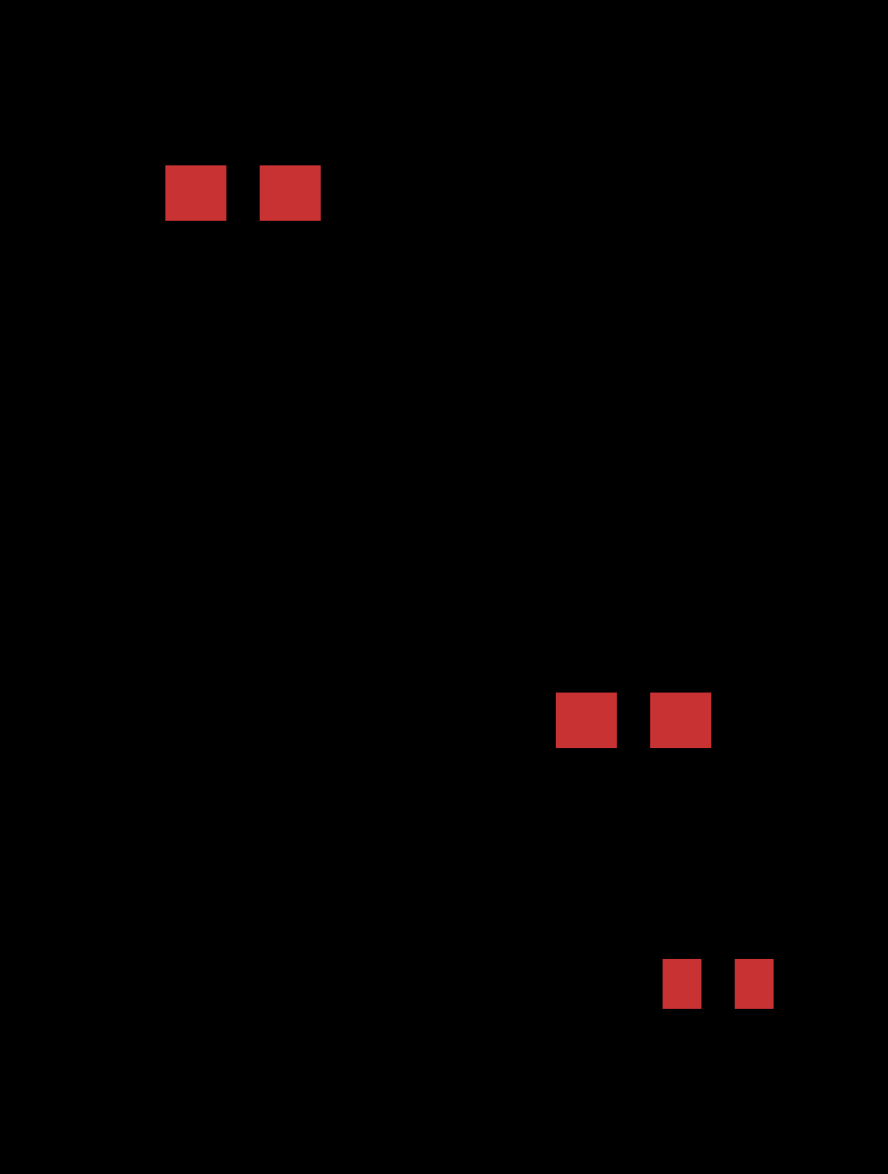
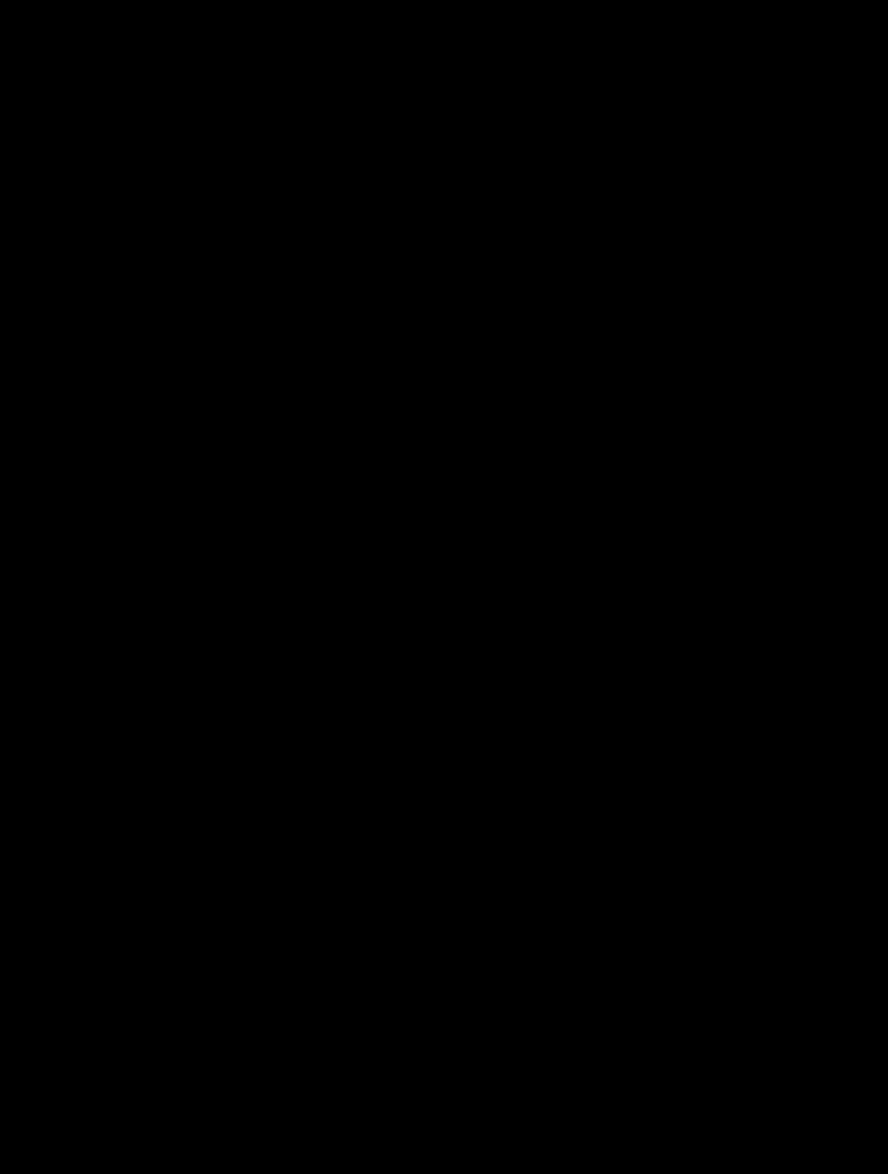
part: (243, 193) -> none
part: (633, 720) -> none
part: (718, 983) -> none

